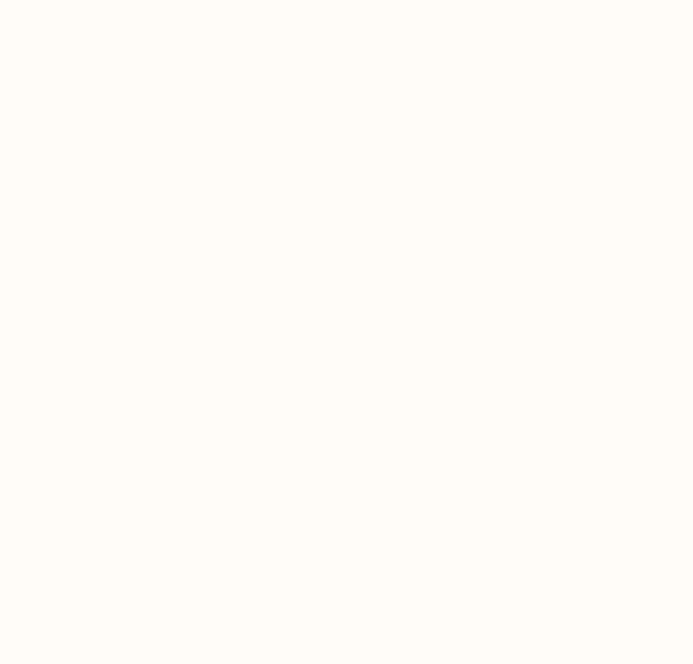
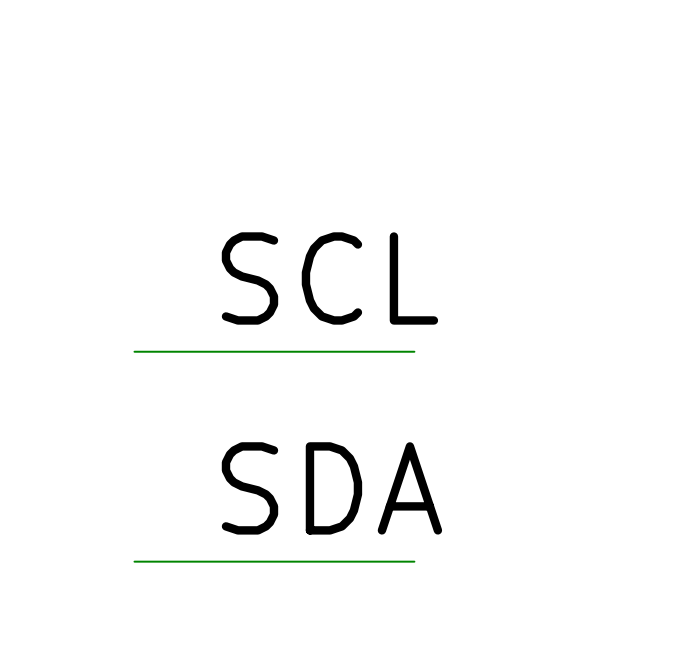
label: none -> SCL (329, 278)
wire: none -> (134, 351) (414, 351)
label: none -> SDA (331, 488)
wire: none -> (134, 561) (414, 561)

